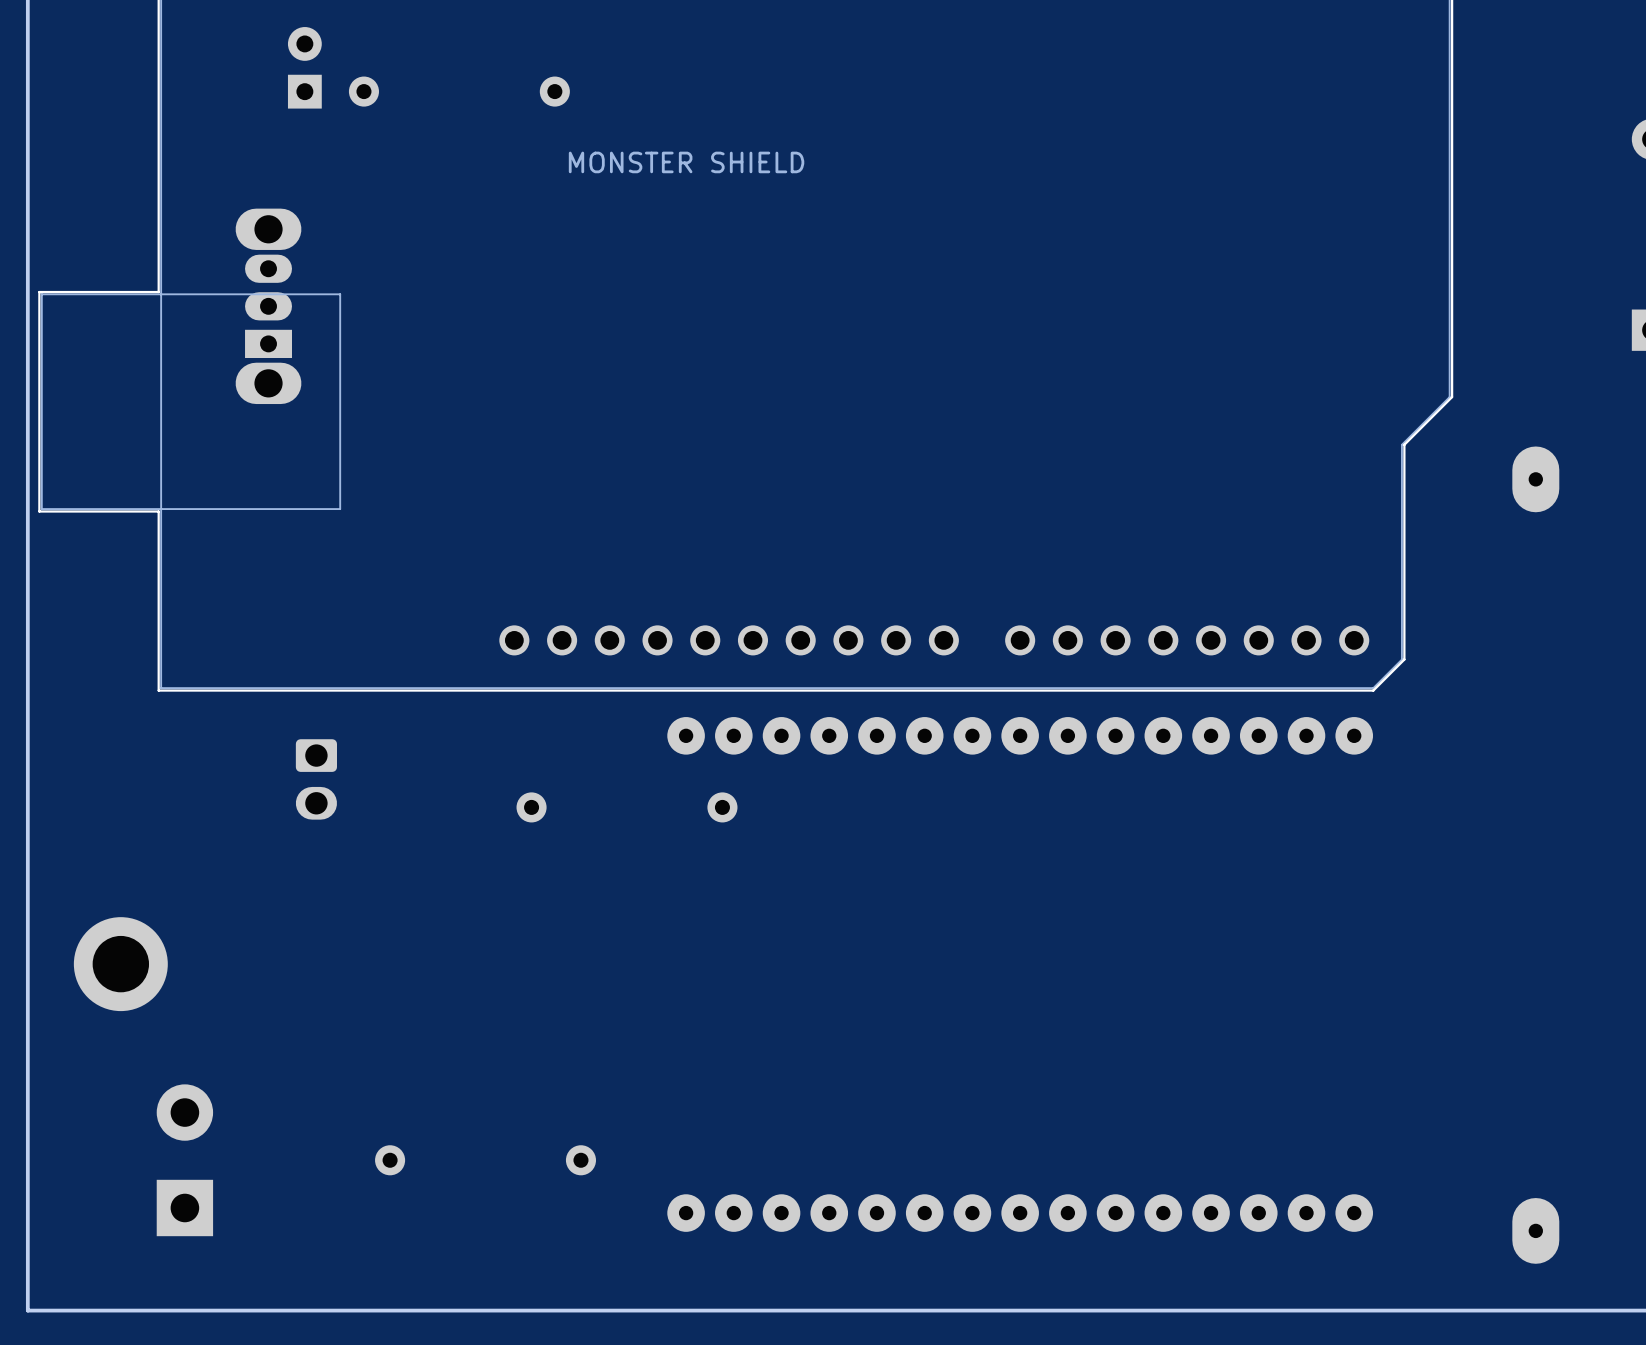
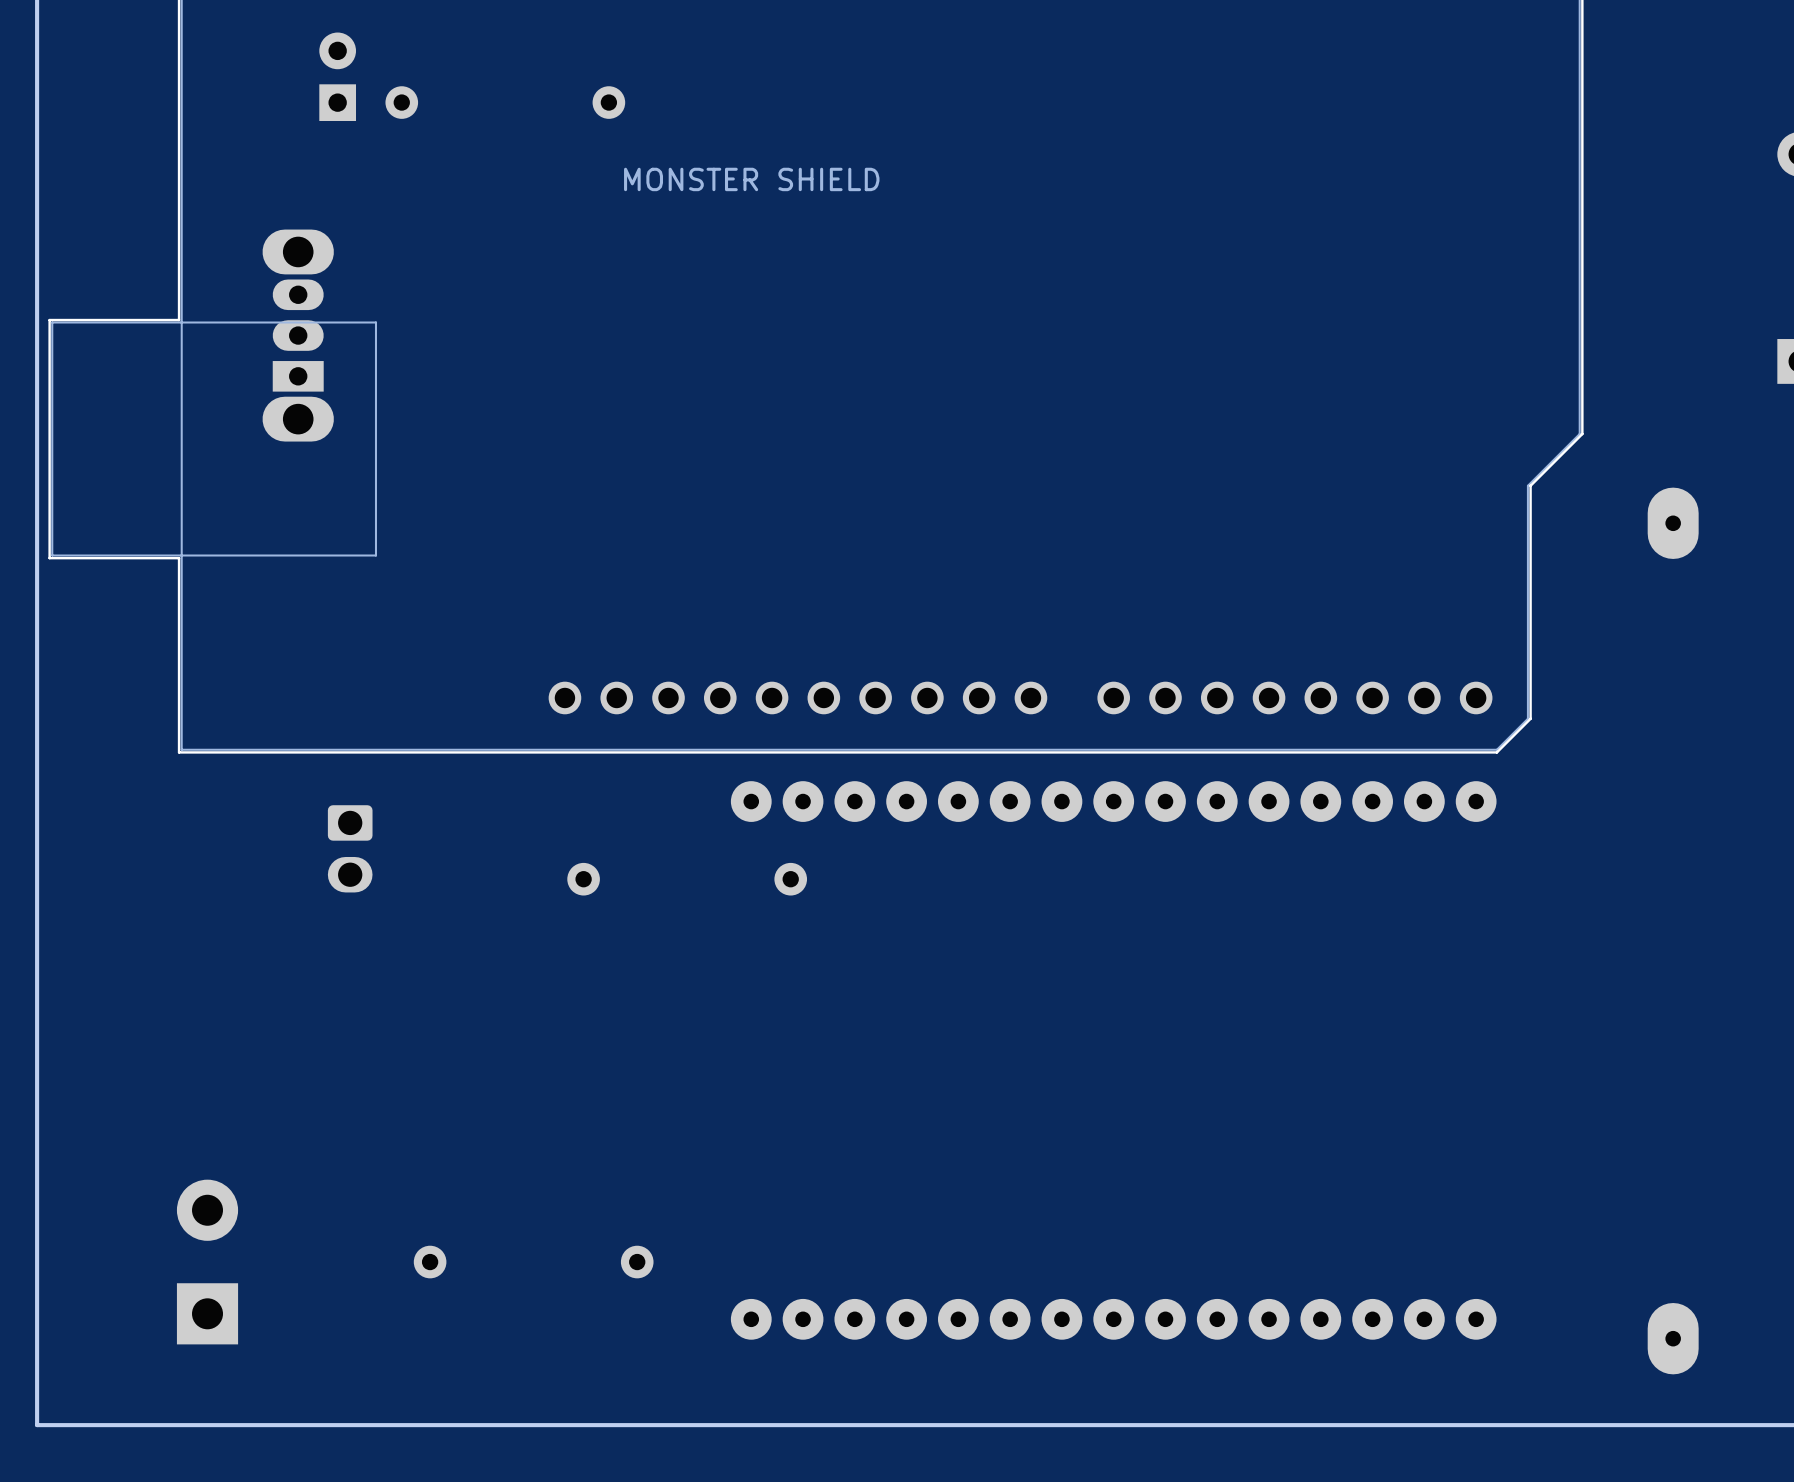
part: (120, 964) -> none

